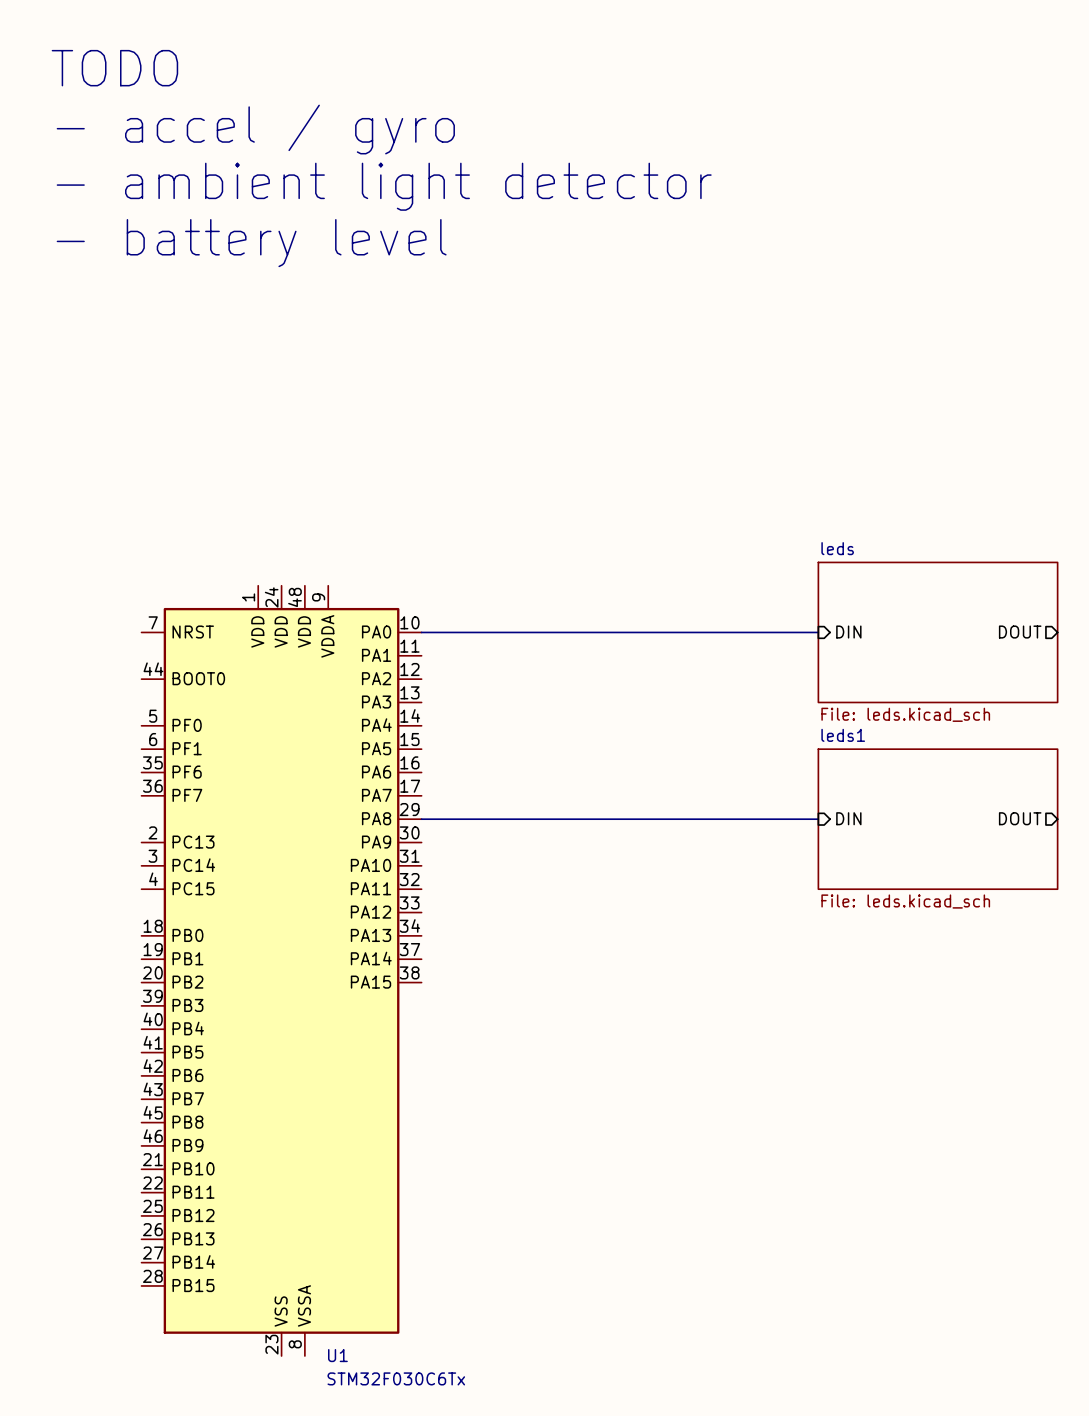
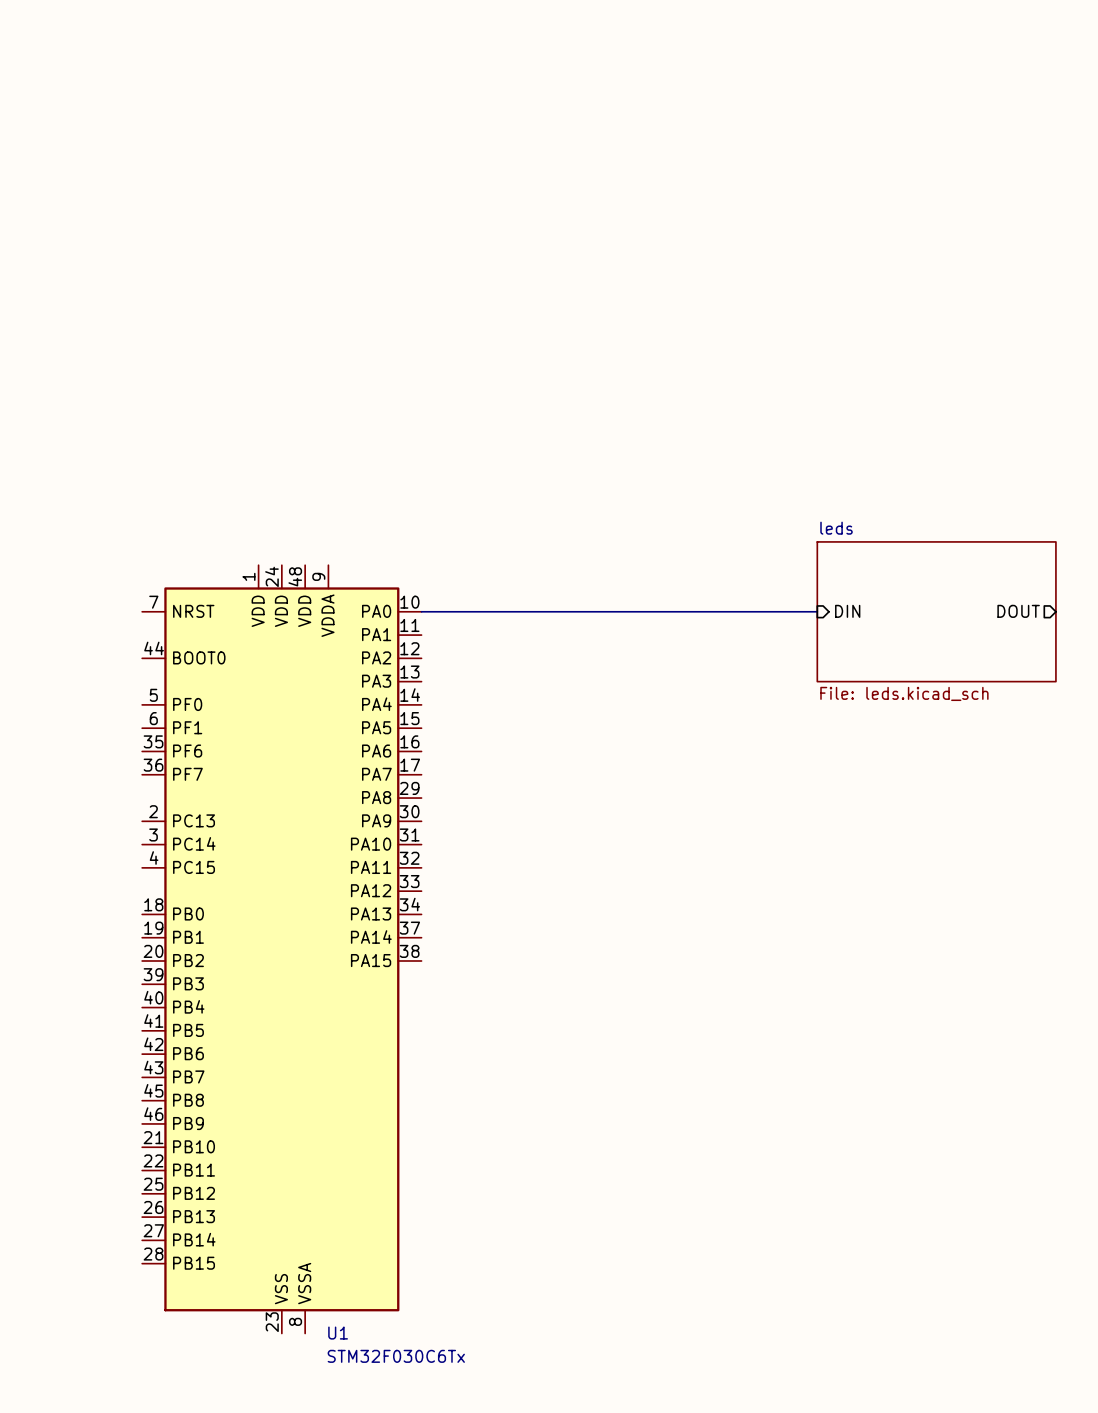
text: TODO (114, 68) -> none
text: - accel / gyro (255, 129) -> none
text: - ambient light detector (384, 186) -> none
text: - battery level (251, 243) -> none
sheet pin: DIN (848, 818) -> none
sheet pin: DOUT (1020, 818) -> none
wire: (421, 819) (818, 819) -> none
sheet leds1: File: leds.kicad_sch (938, 819) -> none

